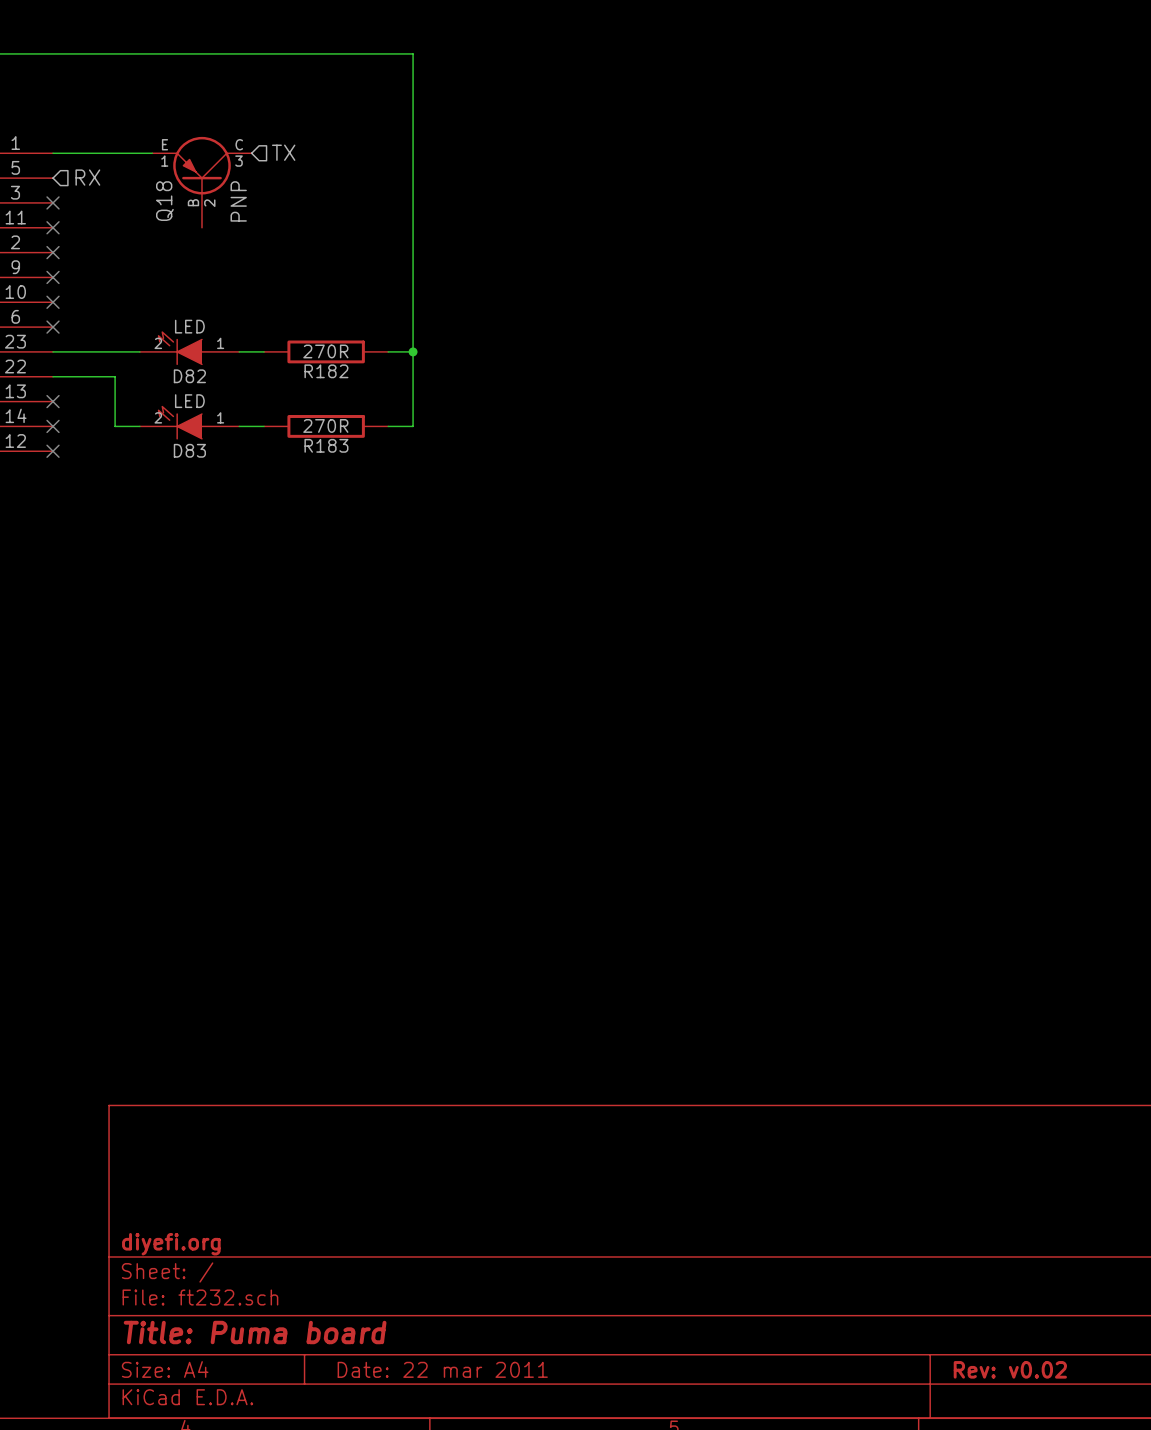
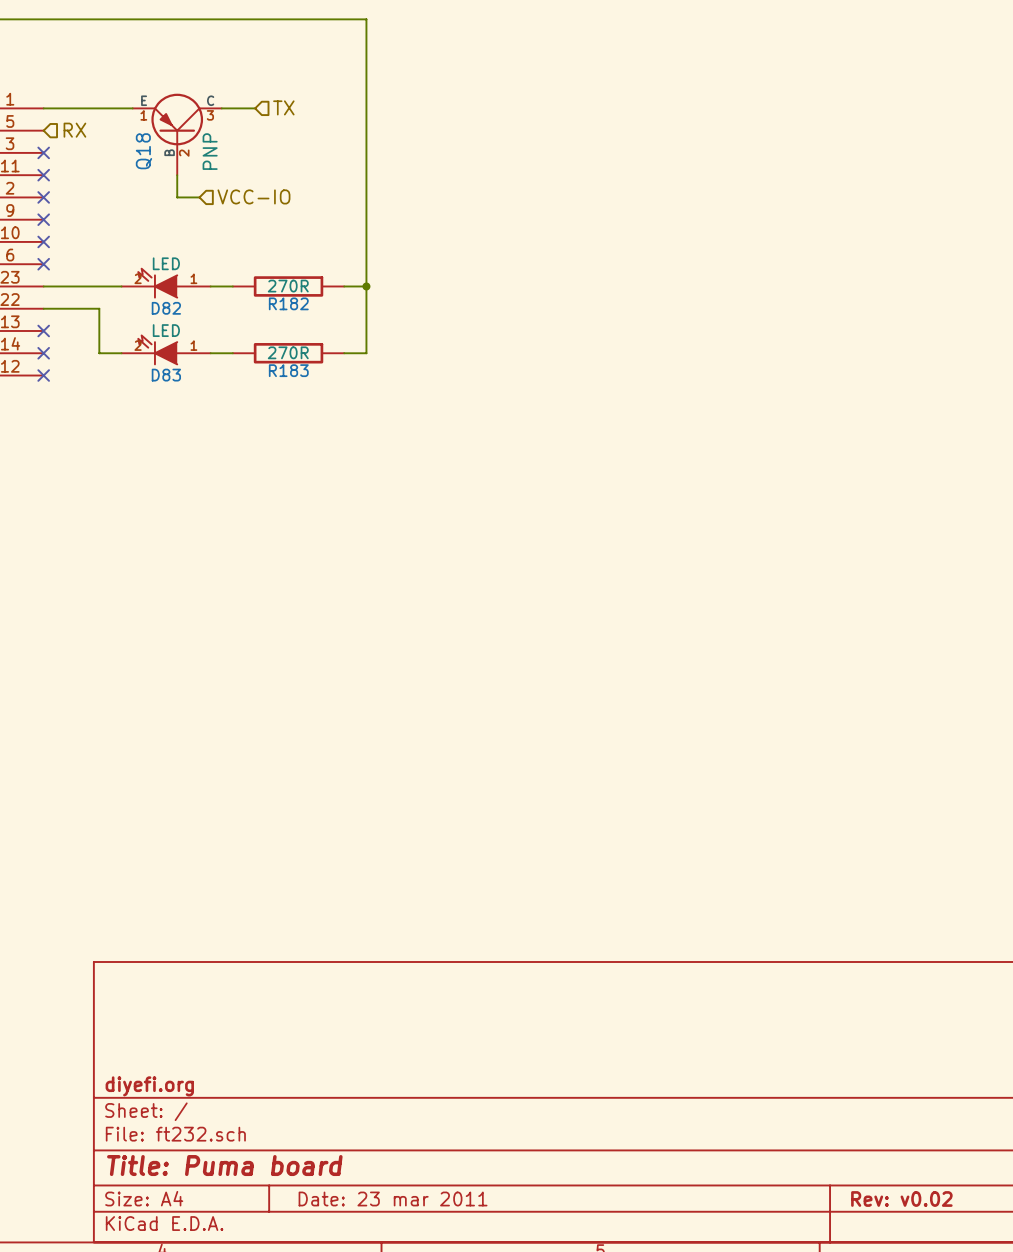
hierarchical label position: TX (283, 152) -> TX (283, 107)
wire: none -> (221, 108) (255, 108)
wire: none -> (177, 175) (177, 197) (199, 197)
hierarchical label: none -> VCC-IO (253, 196)
title block: Date: 22 mar 2011 (442, 1369) -> Date: 23 mar 2011 (393, 1198)

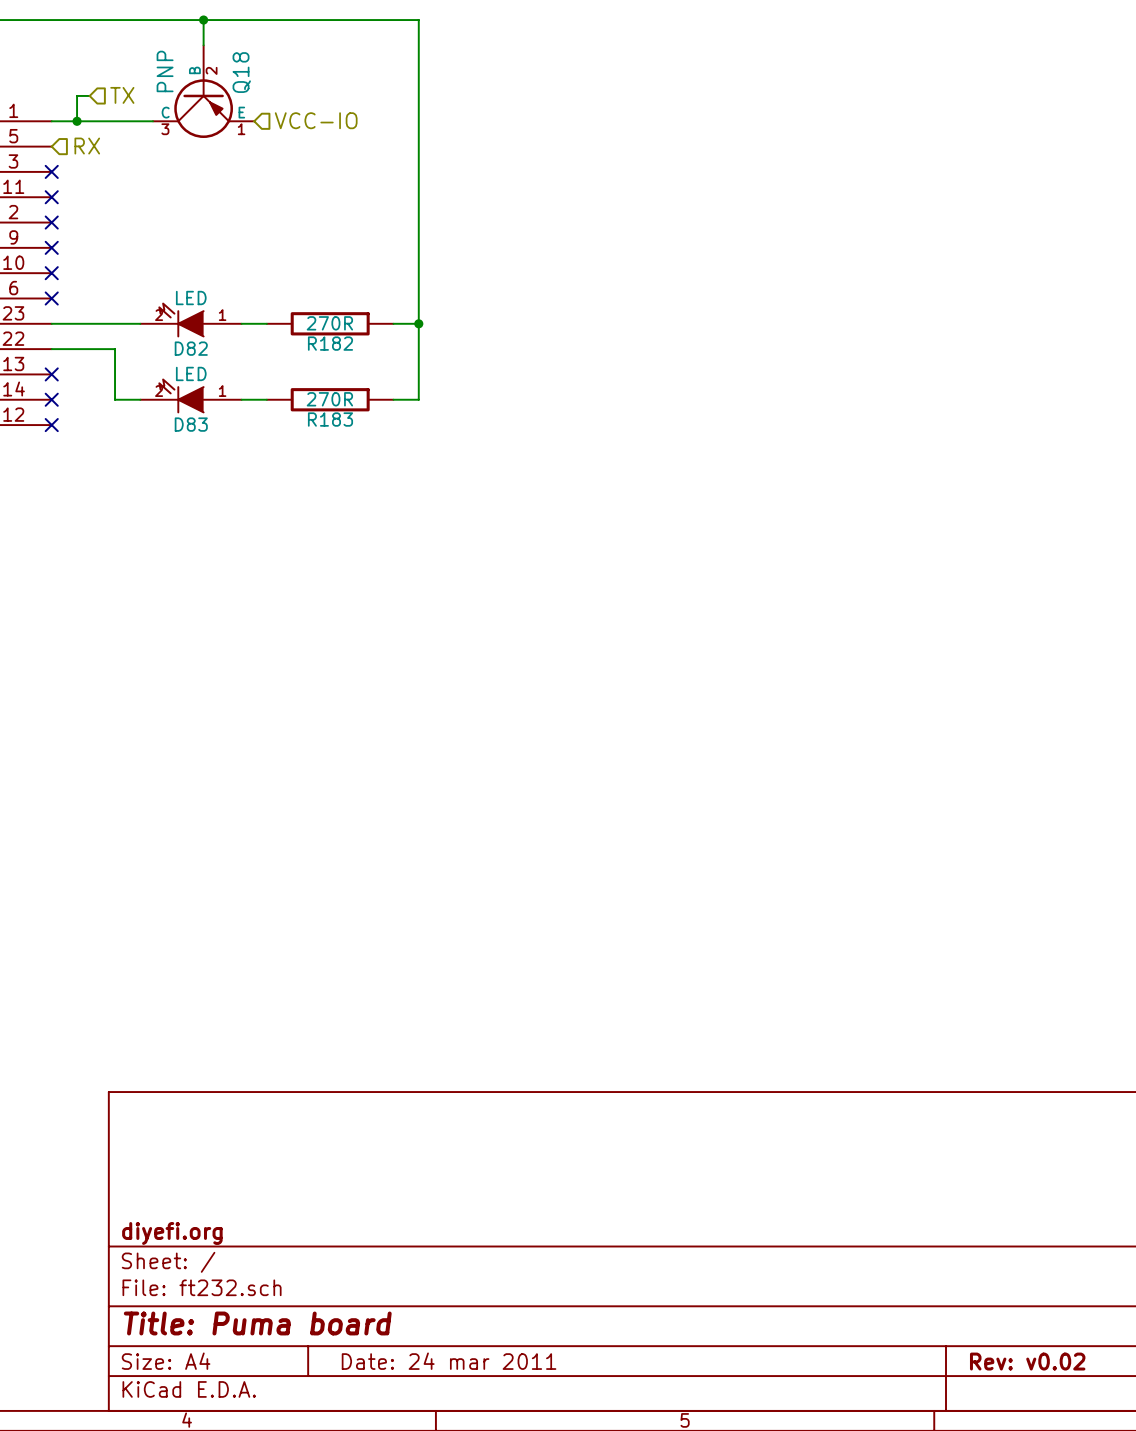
wire: none -> (203, 20) (203, 45)
junction: none -> (203, 20)
wire: none -> (89, 95) (77, 95) (77, 121)
hierarchical label position: TX (283, 107) -> TX (122, 95)
junction: none -> (77, 121)
wire: (221, 108) (255, 108) -> none
Q18 rotation: 0° (177, 119) -> 180° (203, 108)
wire: (177, 175) (177, 197) (199, 197) -> none
hierarchical label position: VCC-IO (253, 196) -> VCC-IO (316, 120)
title block: Date: 23 mar 2011 (393, 1198) -> Date: 24 mar 2011 (449, 1361)

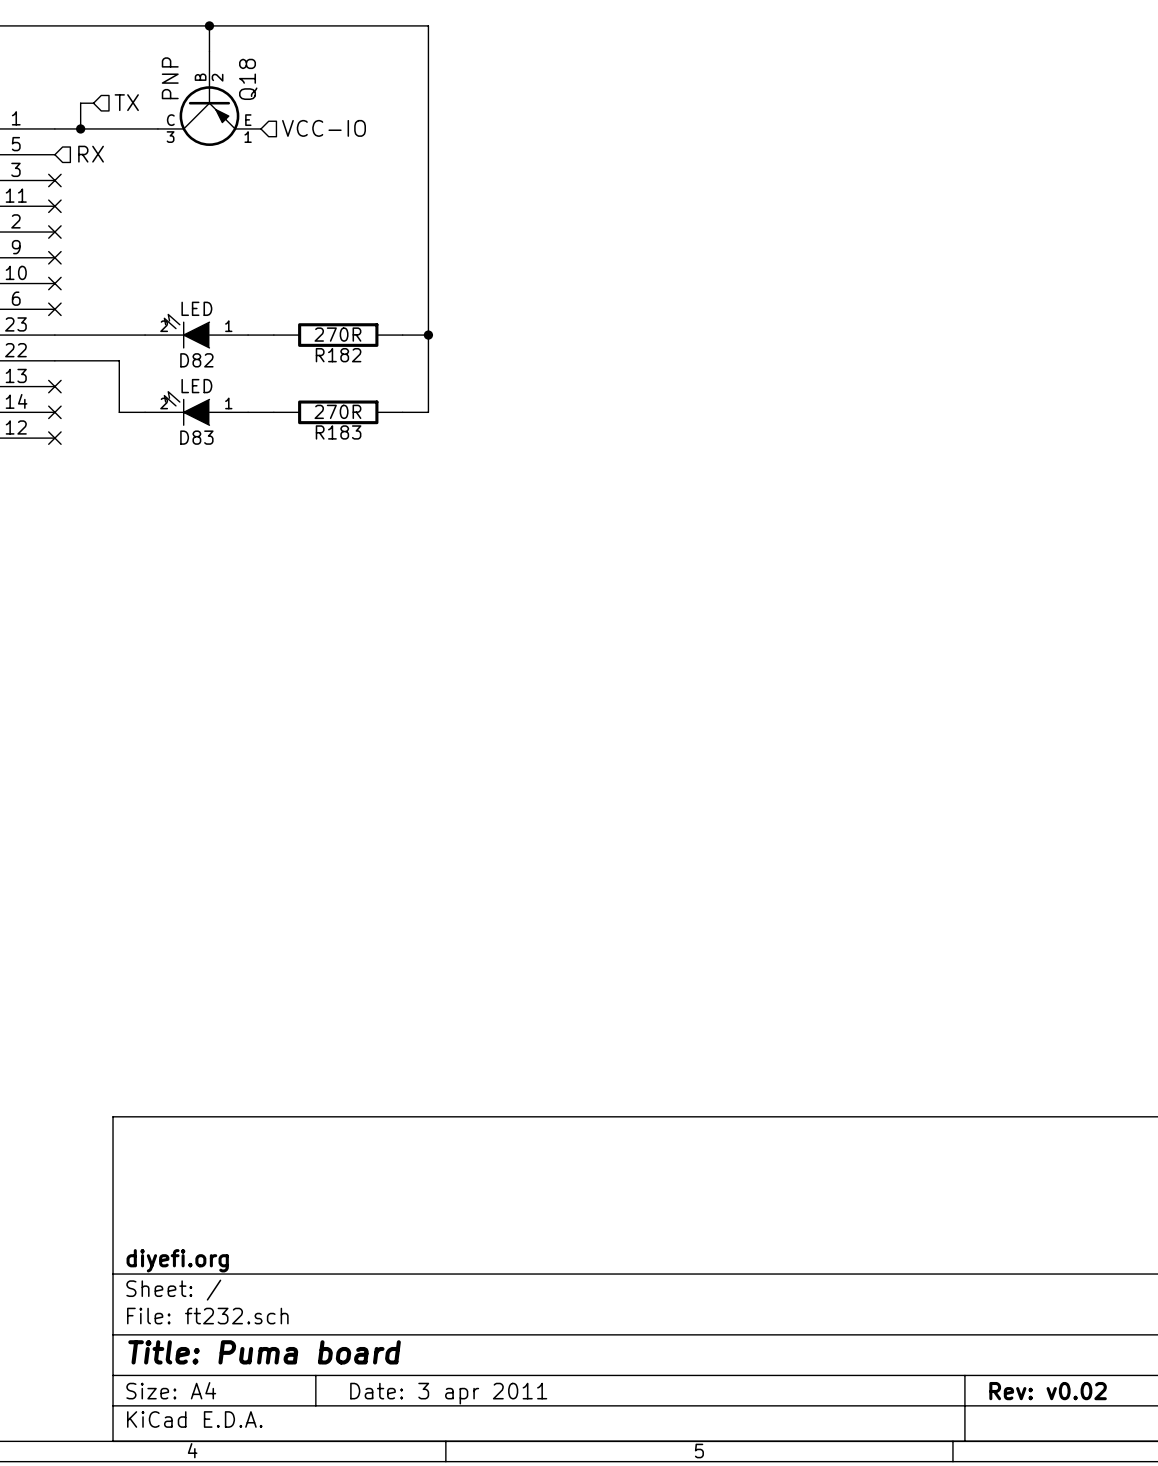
title block: Date: 24 mar 2011 (449, 1361) -> Date: 3 apr 2011 (448, 1393)

